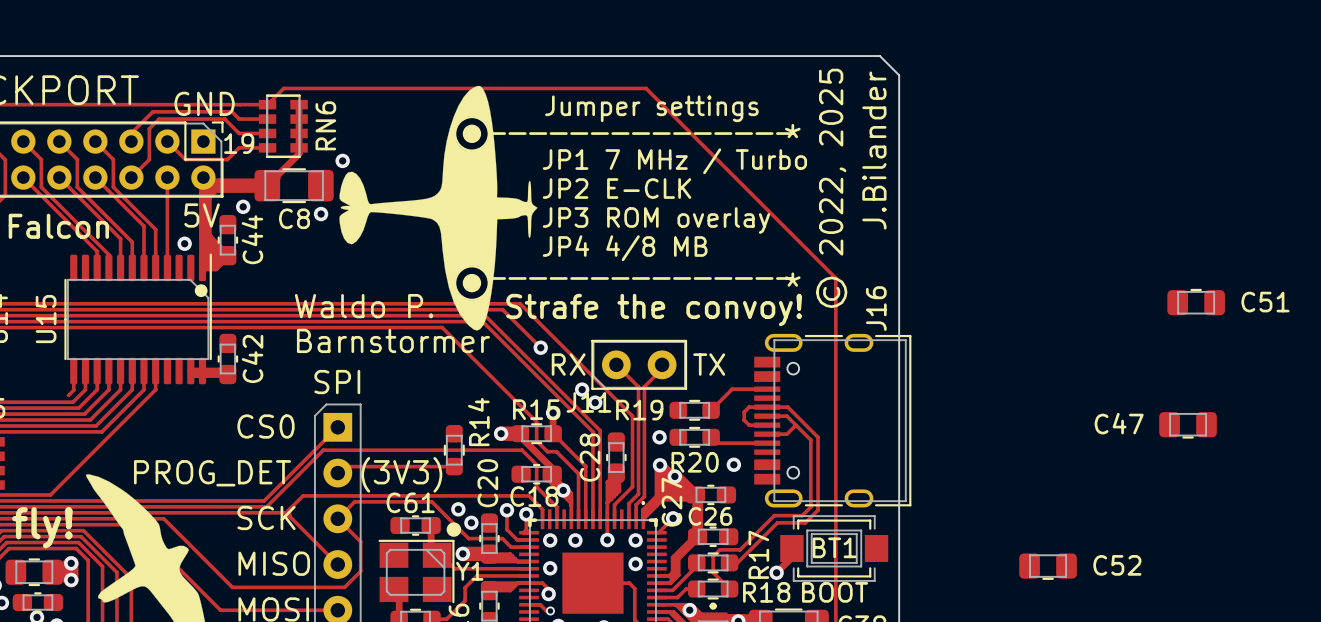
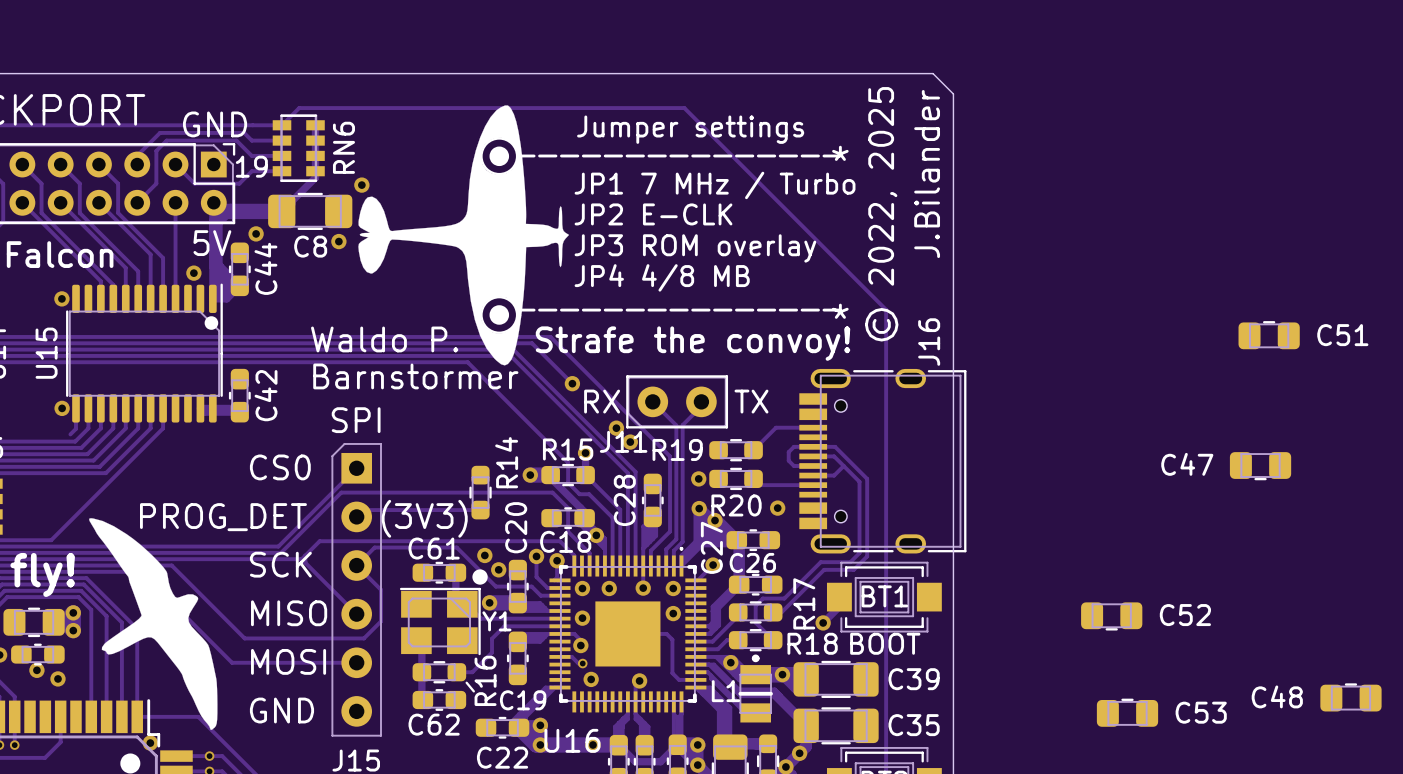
via: none -> (61, 298)
via: none -> (62, 408)

